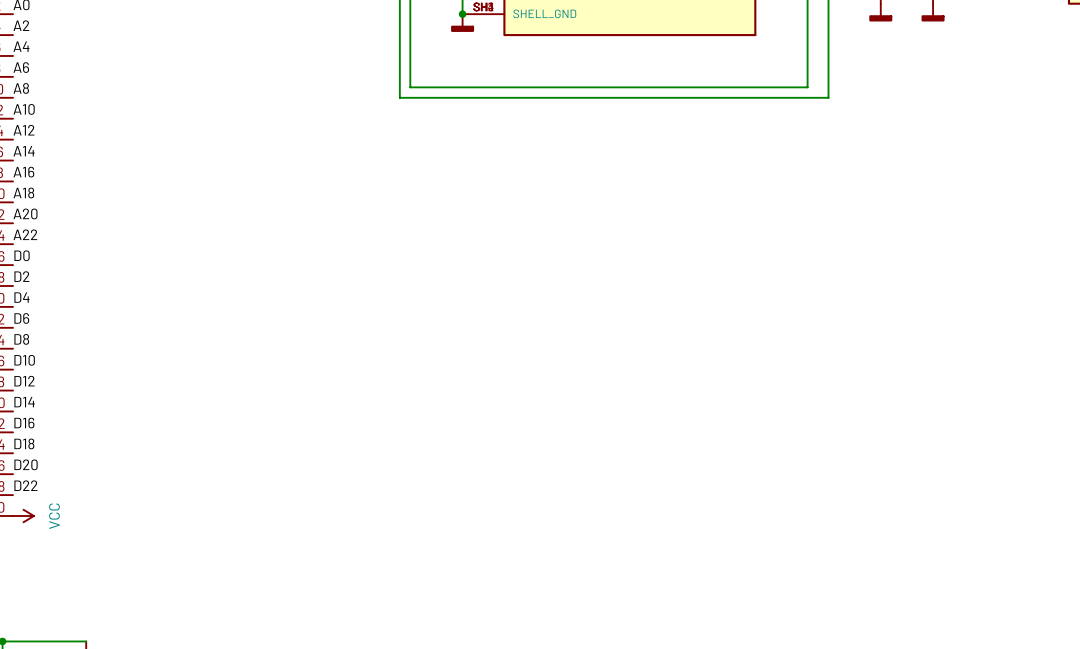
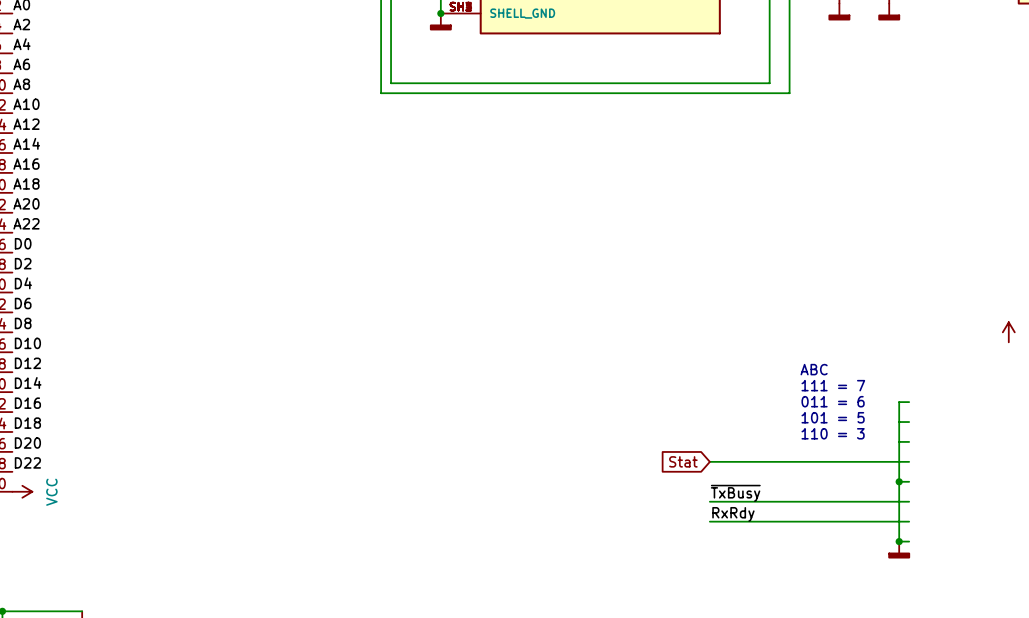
power symbol: none -> (1008, 332)
text: none -> ABC (814, 369)
text: none -> 111 = 7 (833, 385)
text: none -> 011 = 6 (833, 401)
wire: none -> (909, 402) (899, 402) (899, 541) (909, 541)
text: none -> 101 = 5 (833, 417)
wire: none -> (899, 422) (909, 422)
text: none -> 110 = 3 (833, 433)
wire: none -> (899, 441) (909, 441)
global label: none -> Stat (683, 461)
wire: none -> (709, 461) (909, 461)
wire: none -> (899, 481) (909, 481)
junction: none -> (899, 481)
label: none -> ~{TxBusy} (735, 493)
wire: none -> (709, 501) (909, 501)
label: none -> RxRdy (733, 514)
wire: none -> (709, 521) (909, 521)
junction: none -> (899, 541)
power symbol: none -> (899, 550)

